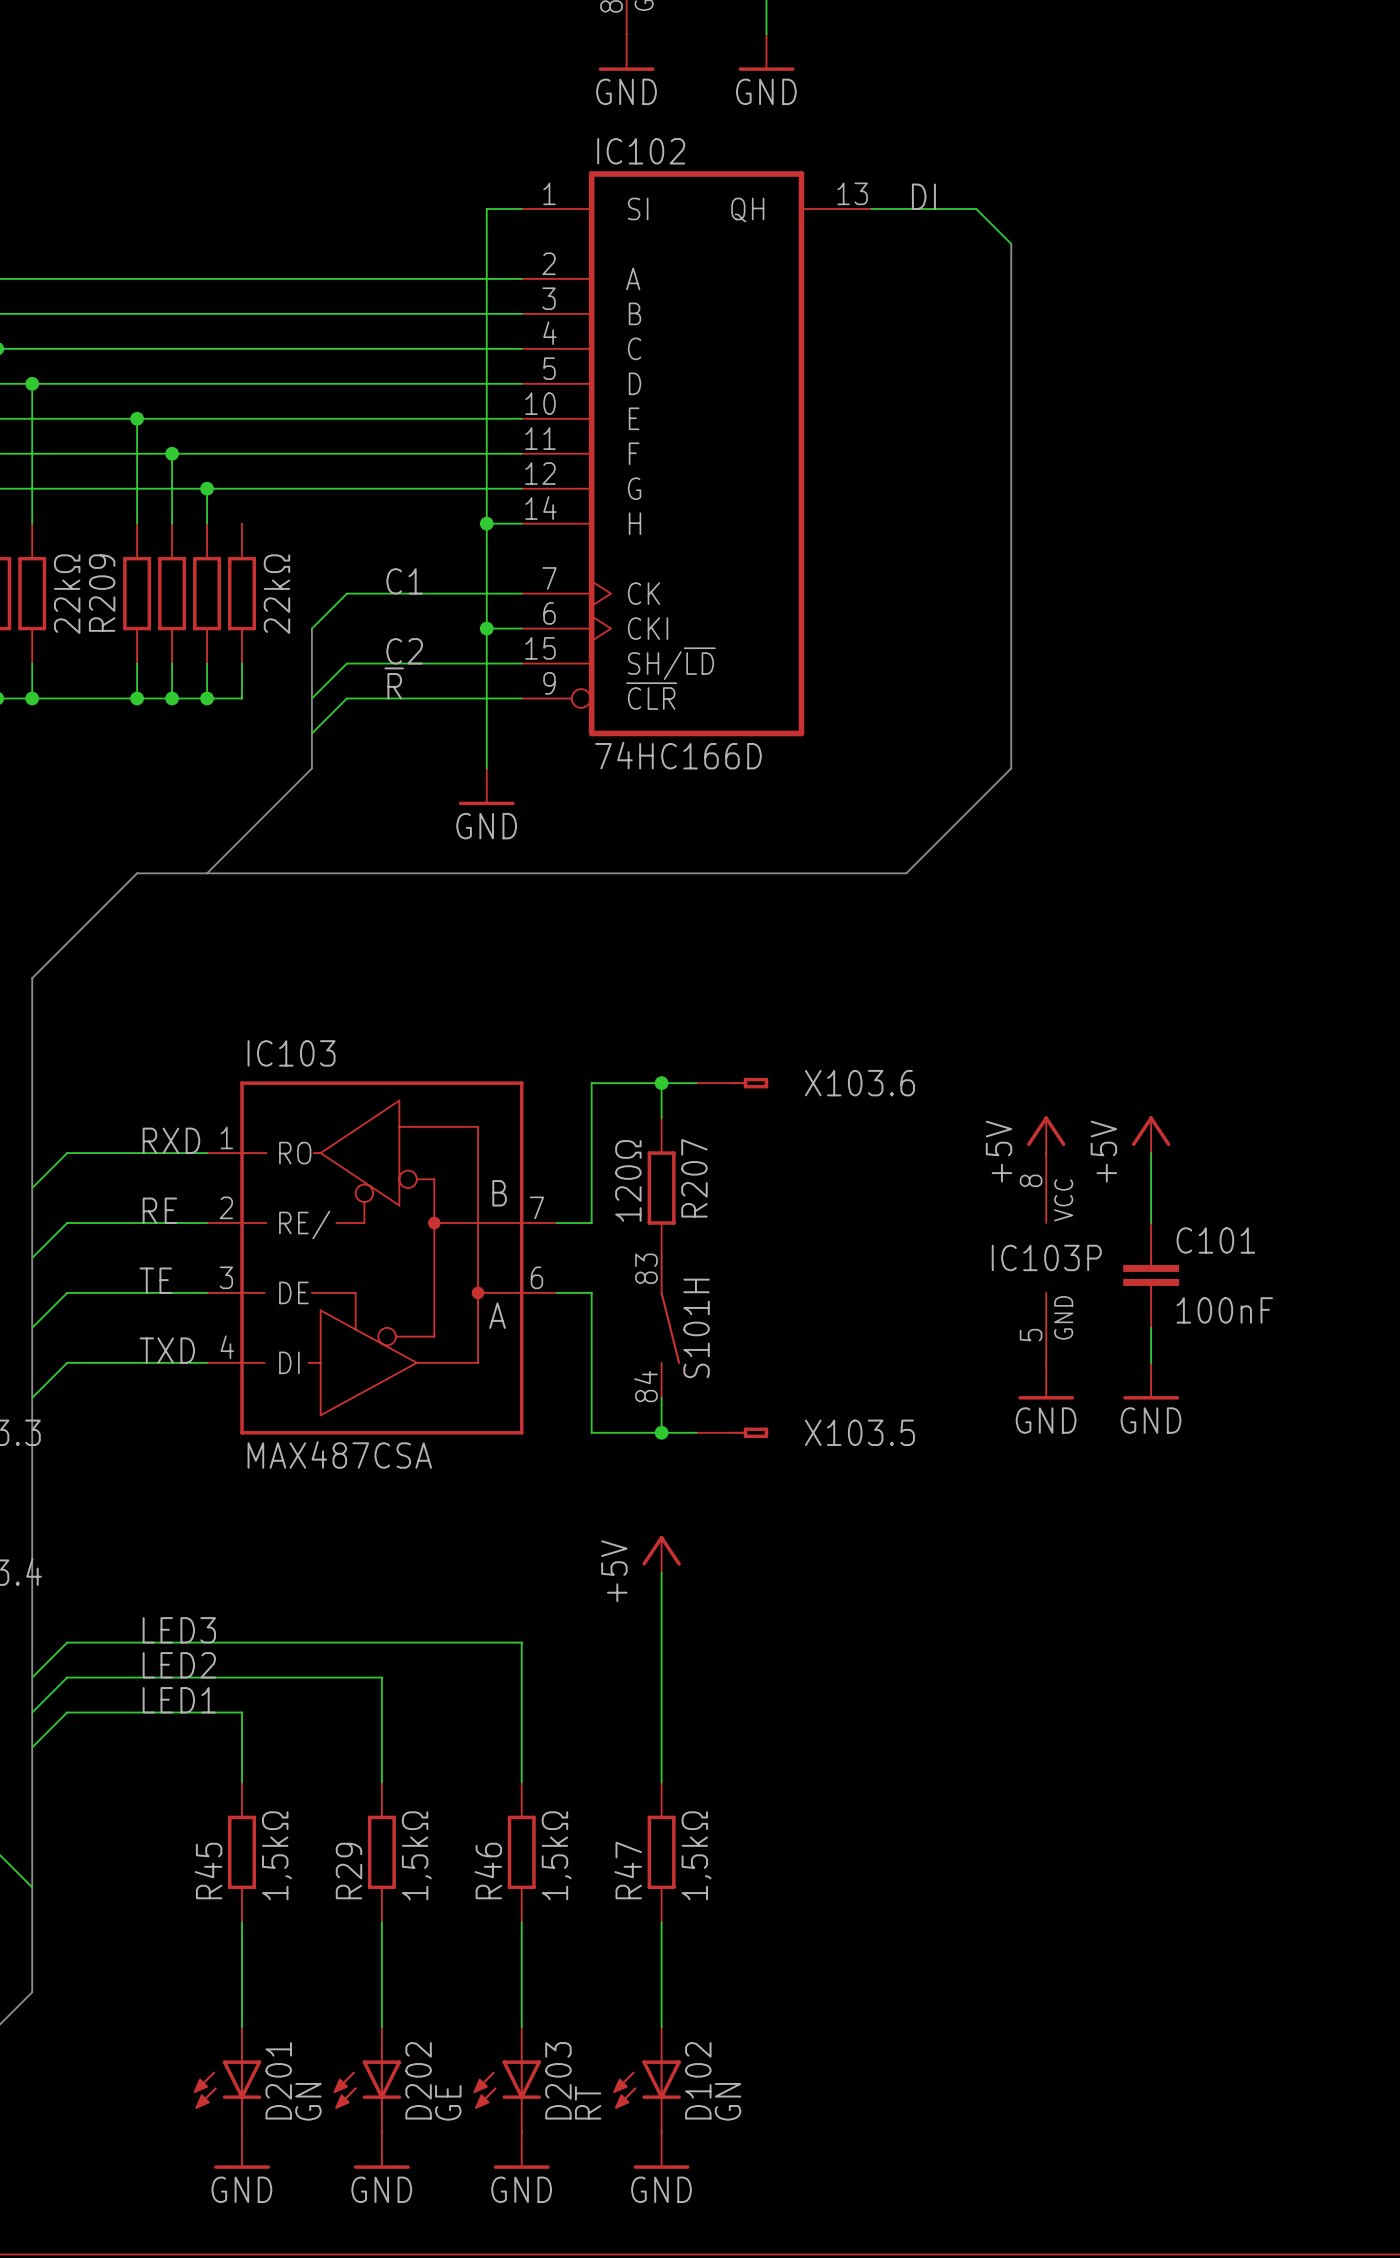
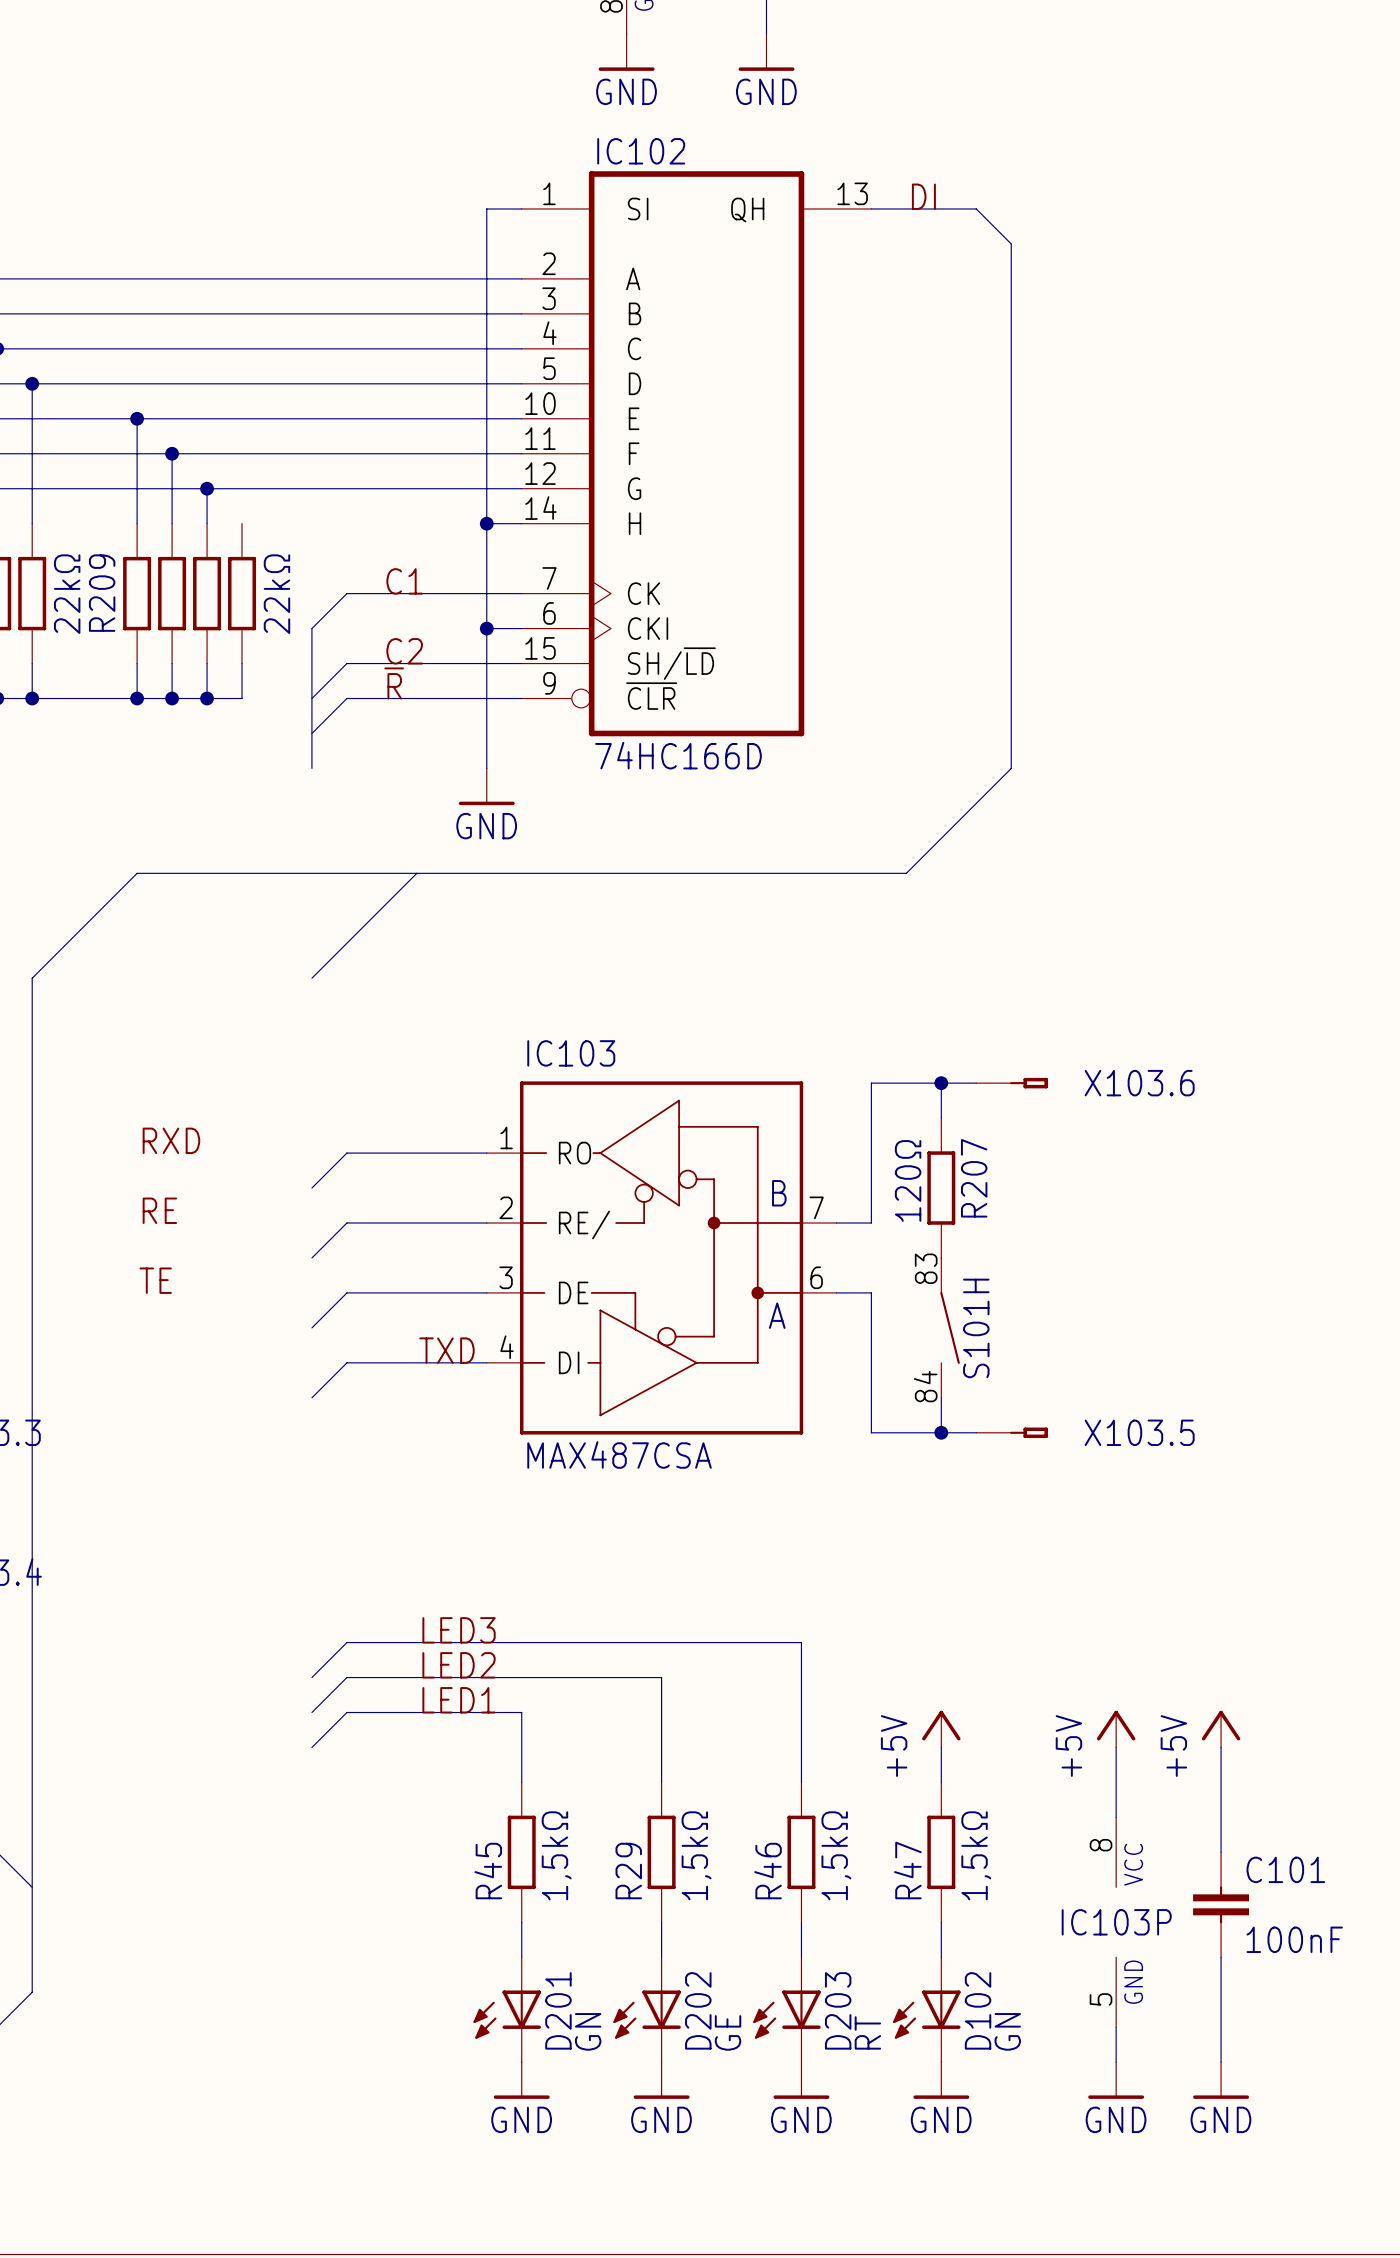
bus: (311, 768) (207, 873) -> (416, 873) (311, 978)
wire: (661, 1083) (661, 1118) -> (941, 1083) (941, 1118)
junction: (661, 1083) -> none
wire: (696, 1083) (591, 1083) (591, 1223) (556, 1223) -> (976, 1083) (871, 1083) (871, 1223) (836, 1223)
X103.6 position: (732, 1083) -> (1012, 1083)
junction: none -> (941, 1083)
power symbol: +5V (1046, 1134) -> none
power symbol: +5V (1151, 1134) -> none
wire: (207, 1153) (67, 1153) (32, 1188) -> (486, 1153) (346, 1153) (311, 1188)
wire: (1151, 1153) (1151, 1223) -> none
R207 position: (661, 1188) -> (941, 1188)
wire: (207, 1223) (67, 1223) (32, 1257) -> (486, 1223) (346, 1223) (311, 1257)
IC103 position: (381, 1257) -> (661, 1257)
IC103P position: (1046, 1257) -> (1116, 1922)
C101 position: (1151, 1275) -> (1221, 1904)
wire: (207, 1292) (67, 1292) (32, 1327) -> (486, 1292) (346, 1292) (311, 1327)
wire: (556, 1292) (591, 1292) (591, 1432) (696, 1432) -> (836, 1292) (871, 1292) (871, 1432) (976, 1432)
S101H position: (670, 1327) -> (950, 1327)
wire: (1151, 1327) (1151, 1362) -> none
label position: TXD (167, 1350) -> TXD (446, 1350)
wire: (207, 1362) (67, 1362) (32, 1397) -> (486, 1362) (346, 1362) (311, 1397)
power symbol: GND (1046, 1381) -> none
power symbol: GND (1151, 1381) -> none
wire: (661, 1397) (661, 1432) -> (941, 1397) (941, 1432)
junction: (661, 1432) -> none
X103.5 position: (732, 1432) -> (1012, 1432)
junction: none -> (941, 1432)
power symbol: +5V (661, 1554) -> none
wire: (661, 1572) (661, 1677) -> (381, 1677) (661, 1677)
label position: LED3 (179, 1630) -> LED3 (459, 1630)
wire: (346, 1642) (67, 1642) (32, 1677) -> (346, 1642) (311, 1677)
wire: (521, 1642) (521, 1712) -> (311, 1747) (346, 1712) (521, 1712)
wire: none -> (521, 1642) (801, 1642) (801, 1782)
label position: LED2 (179, 1665) -> LED2 (459, 1665)
wire: (346, 1677) (67, 1677) (32, 1712) -> (346, 1677) (311, 1712)
wire: (381, 1677) (381, 1782) -> none
label position: LED1 (179, 1700) -> LED1 (459, 1700)
power symbol: none -> +5V (941, 1729)
power symbol: none -> +5V (1116, 1729)
power symbol: none -> +5V (1221, 1729)
wire: (32, 1747) (67, 1712) (242, 1712) (242, 1782) -> none
wire: none -> (941, 1747) (941, 1782)
wire: none -> (1116, 1747) (1116, 1817)
wire: none -> (1221, 1747) (1221, 1852)
R45: 1,5kΩ (242, 1852) -> none
R29: 1,5kΩ (381, 1852) -> none
R46: none -> 1,5kΩ (801, 1852)
R47: none -> 1,5kΩ (941, 1852)
R47 name: R47 (628, 1870) -> R29 (628, 1871)
R46 name: R46 (488, 1871) -> R45 (488, 1871)
wire: (242, 1922) (242, 2027) -> none
wire: (381, 1922) (381, 2027) -> none
wire: none -> (801, 1922) (801, 1957)
wire: none -> (941, 1922) (941, 1957)
wire: none -> (1221, 1957) (1221, 2062)
wire: none -> (1116, 2027) (1116, 2062)
D201 position: (227, 2079) -> (507, 2009)
D202 position: (367, 2079) -> (647, 2009)
D203 position: (507, 2079) -> (786, 2009)
D102 position: (647, 2079) -> (926, 2009)
power symbol: none -> GND (801, 2080)
power symbol: none -> GND (941, 2080)
power symbol: none -> GND (1116, 2080)
power symbol: none -> GND (1221, 2080)
power symbol: GND (242, 2150) -> none
power symbol: GND (381, 2150) -> none
power symbol position: GND (521, 2150) -> GND (521, 2080)
power symbol position: GND (661, 2150) -> GND (661, 2080)

